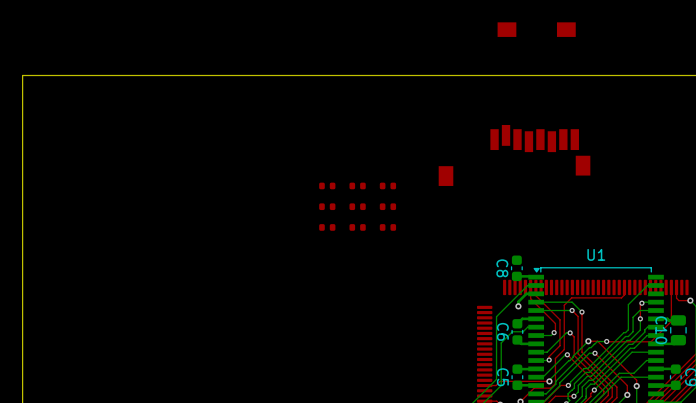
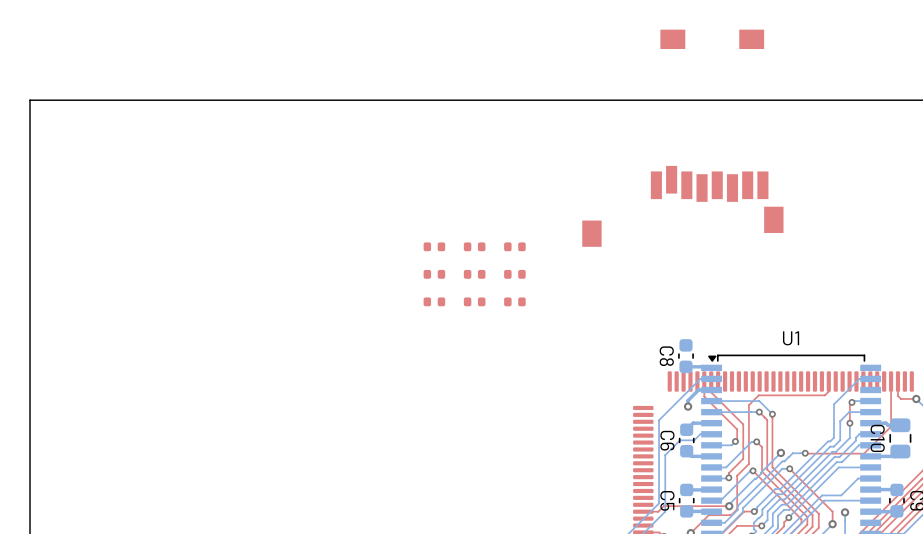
top track: (588, 341) (597, 341) (636, 380) (636, 386) -> none

